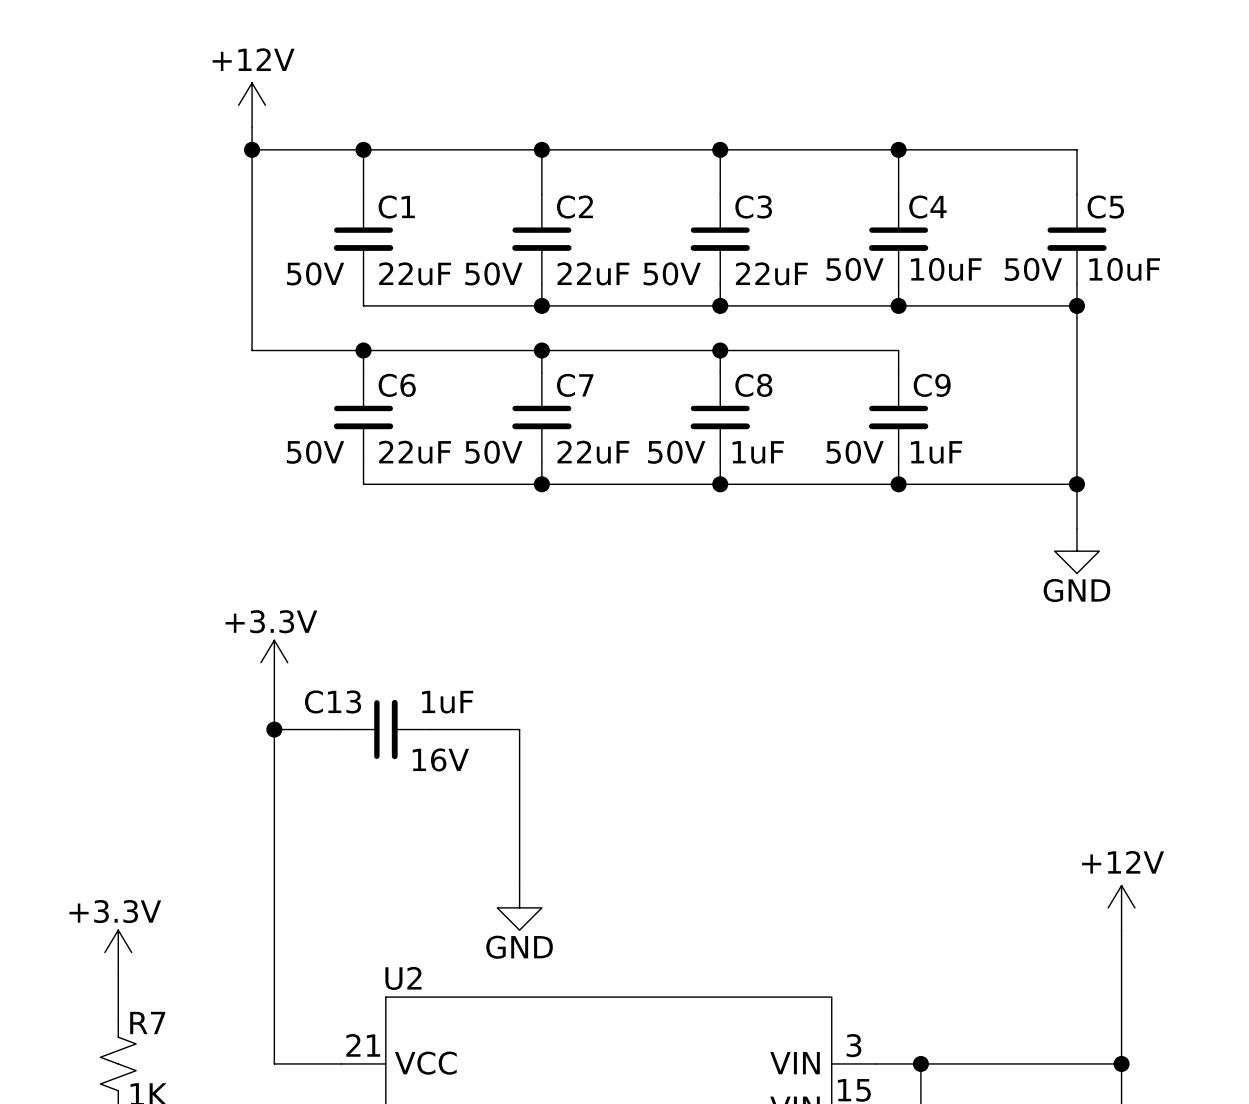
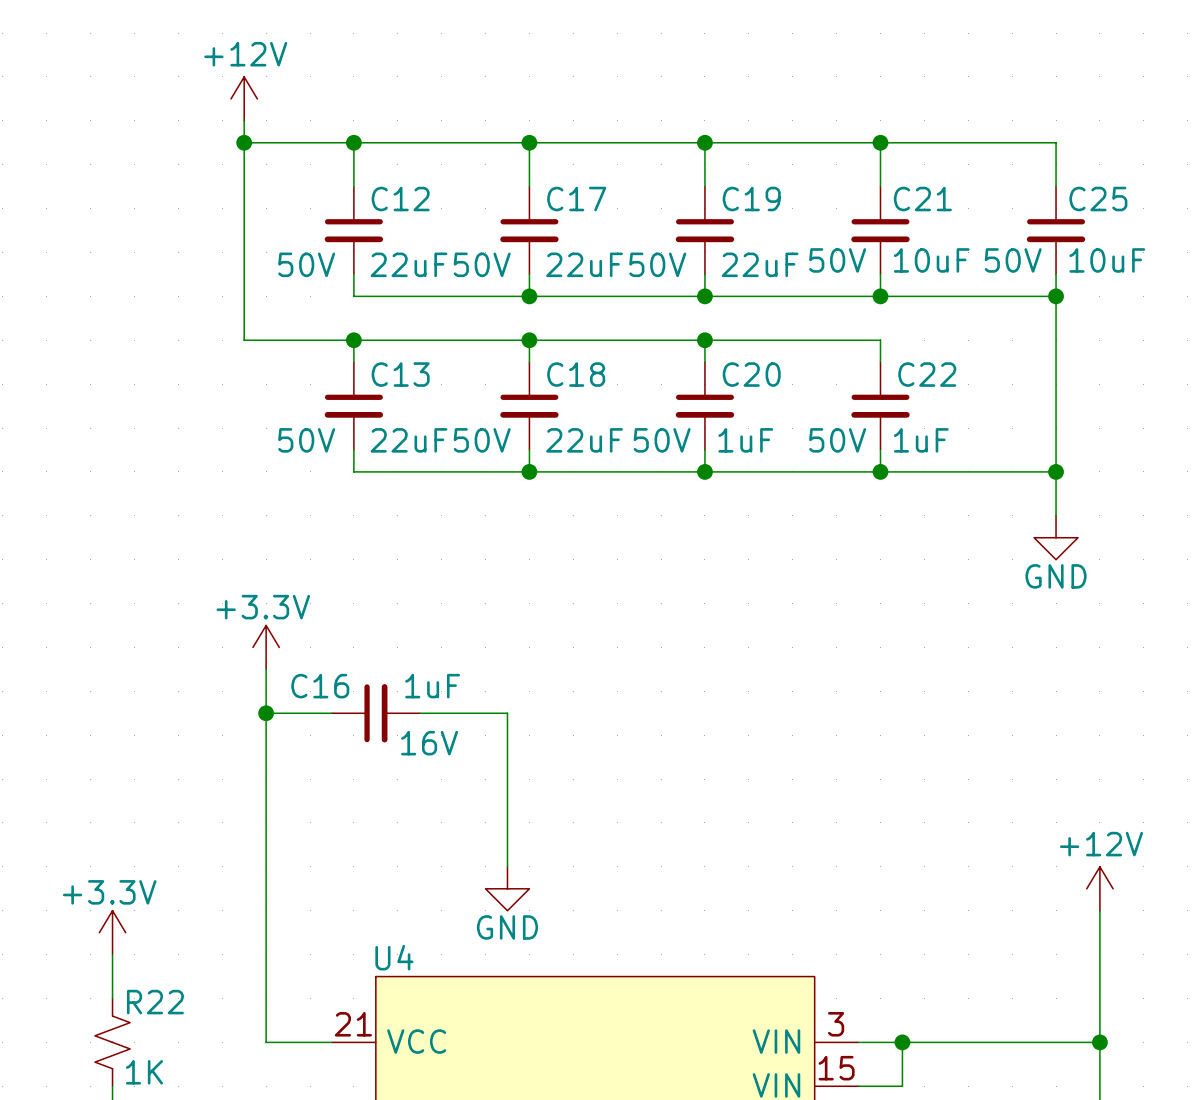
C1 name: C1 (396, 207) -> C12 (400, 199)
C2 name: C2 (575, 207) -> C17 (576, 199)
C3 name: C3 (753, 207) -> C19 (751, 199)
C4 name: C4 (927, 207) -> C21 (922, 199)
C5 name: C5 (1105, 207) -> C25 (1098, 199)
C6 name: C6 (397, 385) -> C13 (400, 374)
C7 name: C7 (575, 385) -> C18 (576, 374)
C8 name: C8 (753, 385) -> C20 (751, 374)
C9 name: C9 (932, 385) -> C22 (927, 374)
C13 name: C13 (333, 701) -> C16 (320, 686)
U2 name: U2 (403, 978) -> U4 (394, 957)
R7 name: R7 (147, 1023) -> R22 (155, 1002)

